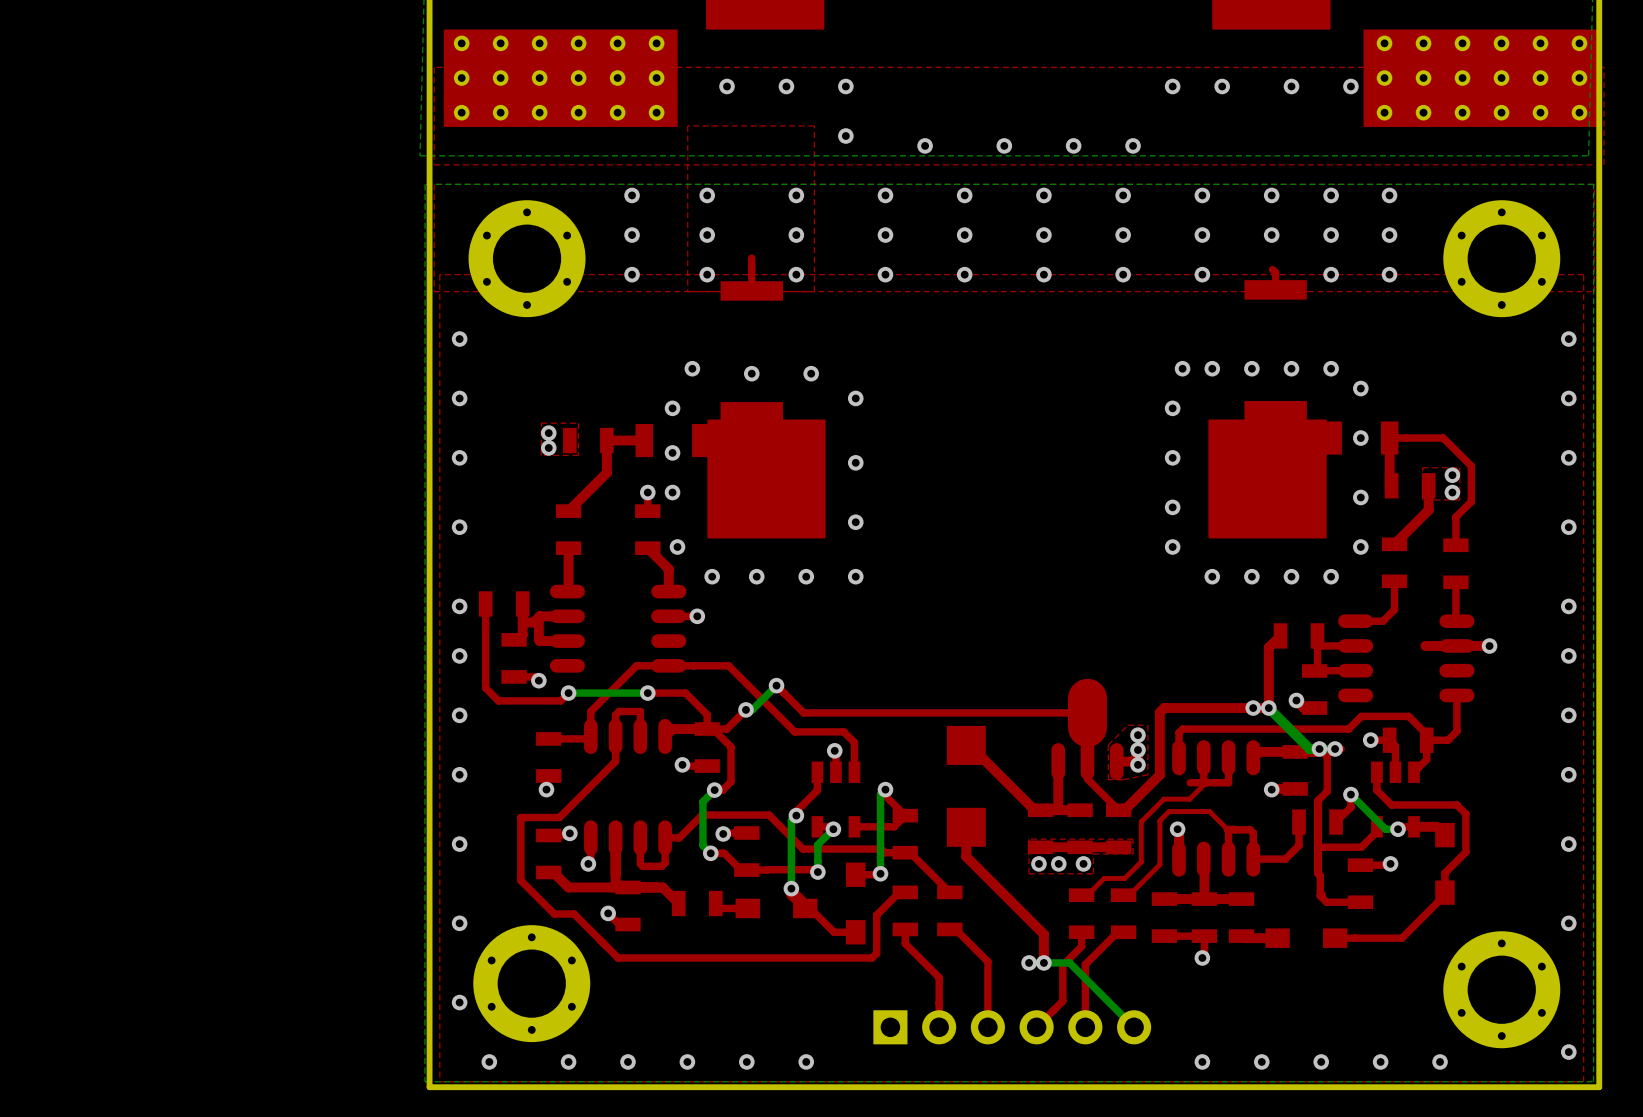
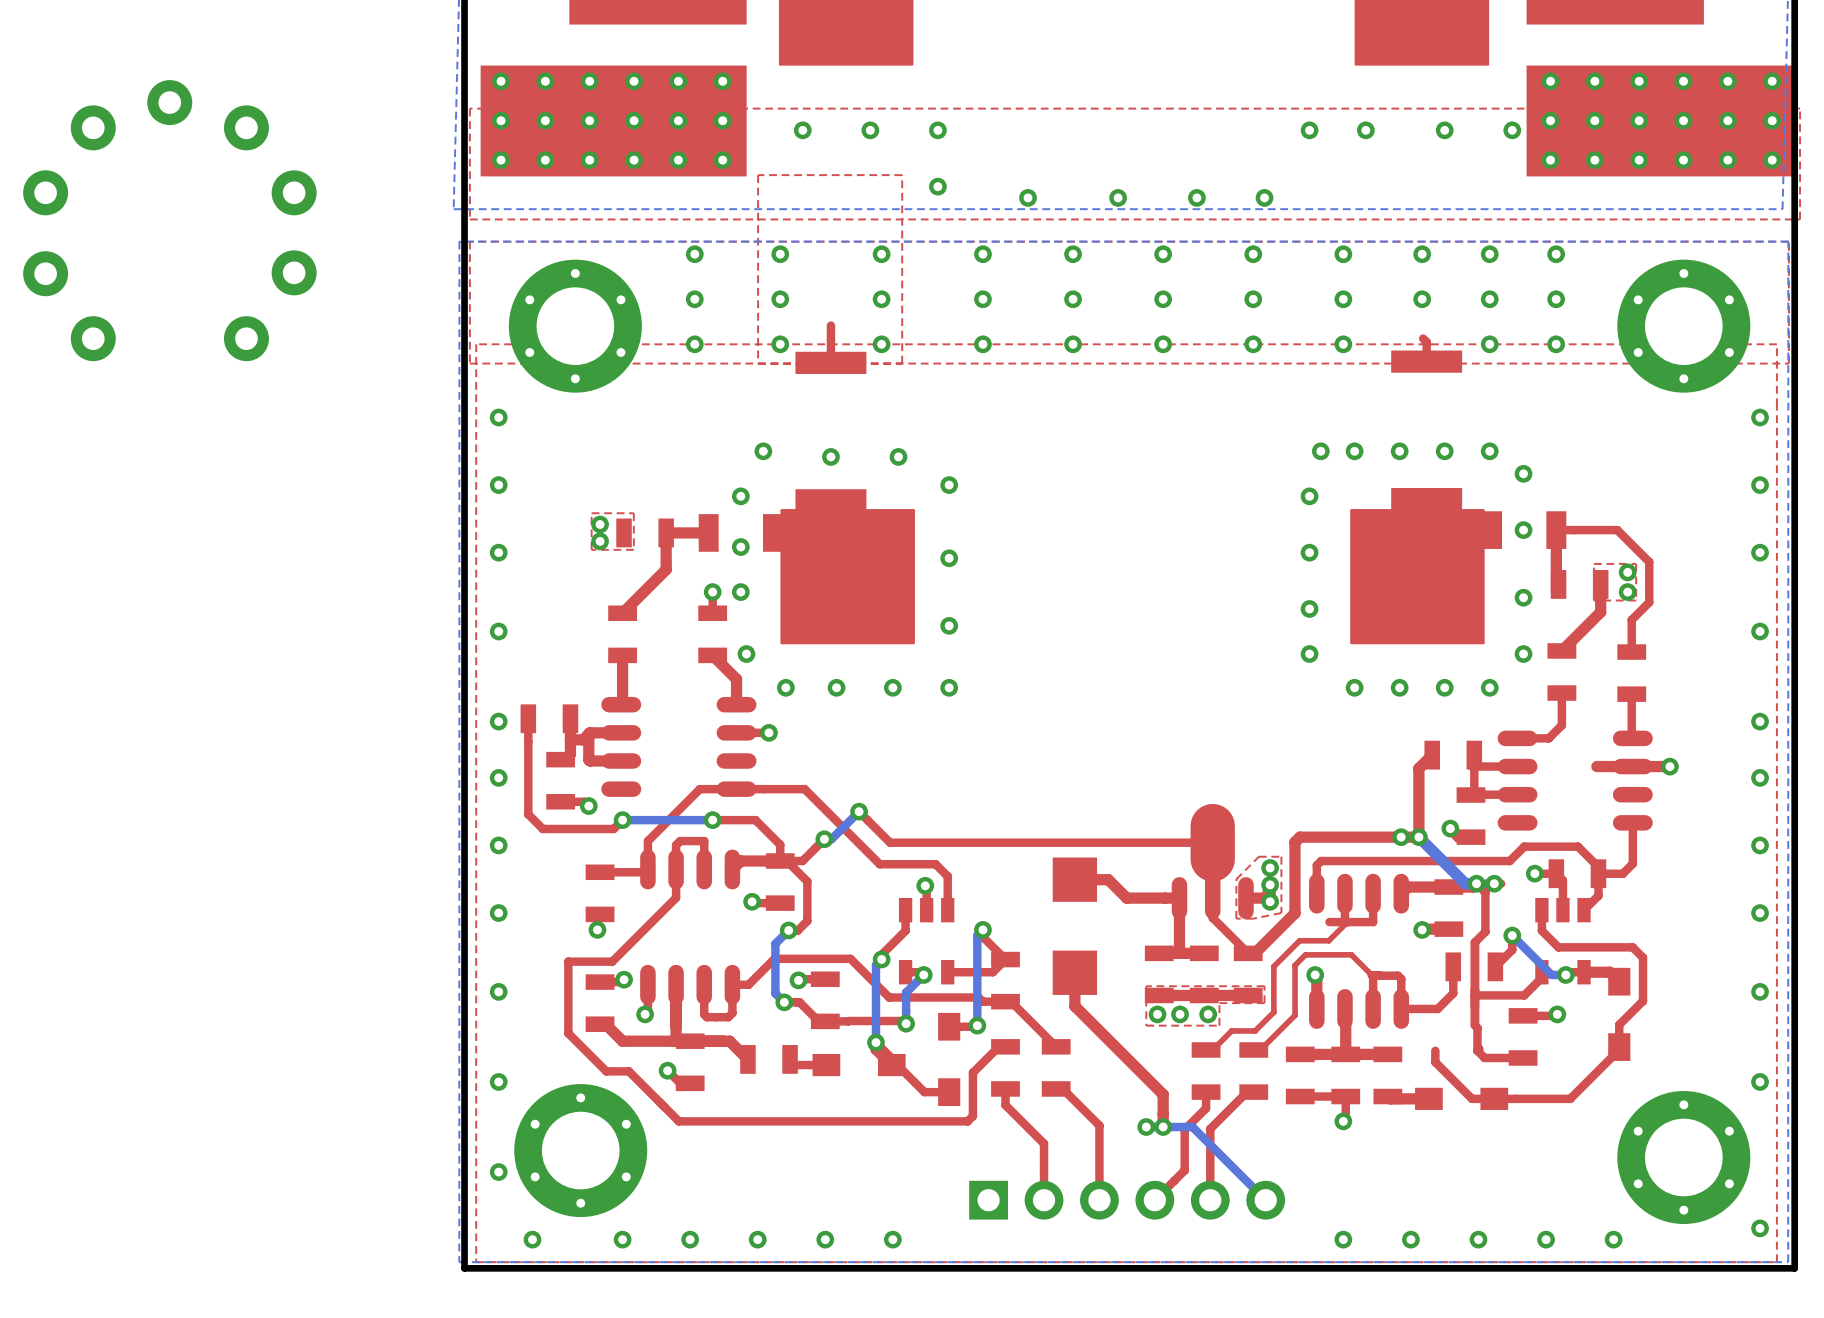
part: none -> (169, 220)
top track: (969, 745) (1034, 810) (1040, 810) -> (1078, 879) (1108, 879) (1126, 898) (1179, 898)
top track: none -> (1435, 1050) (1435, 1062) (1471, 1098) (1494, 1098)

